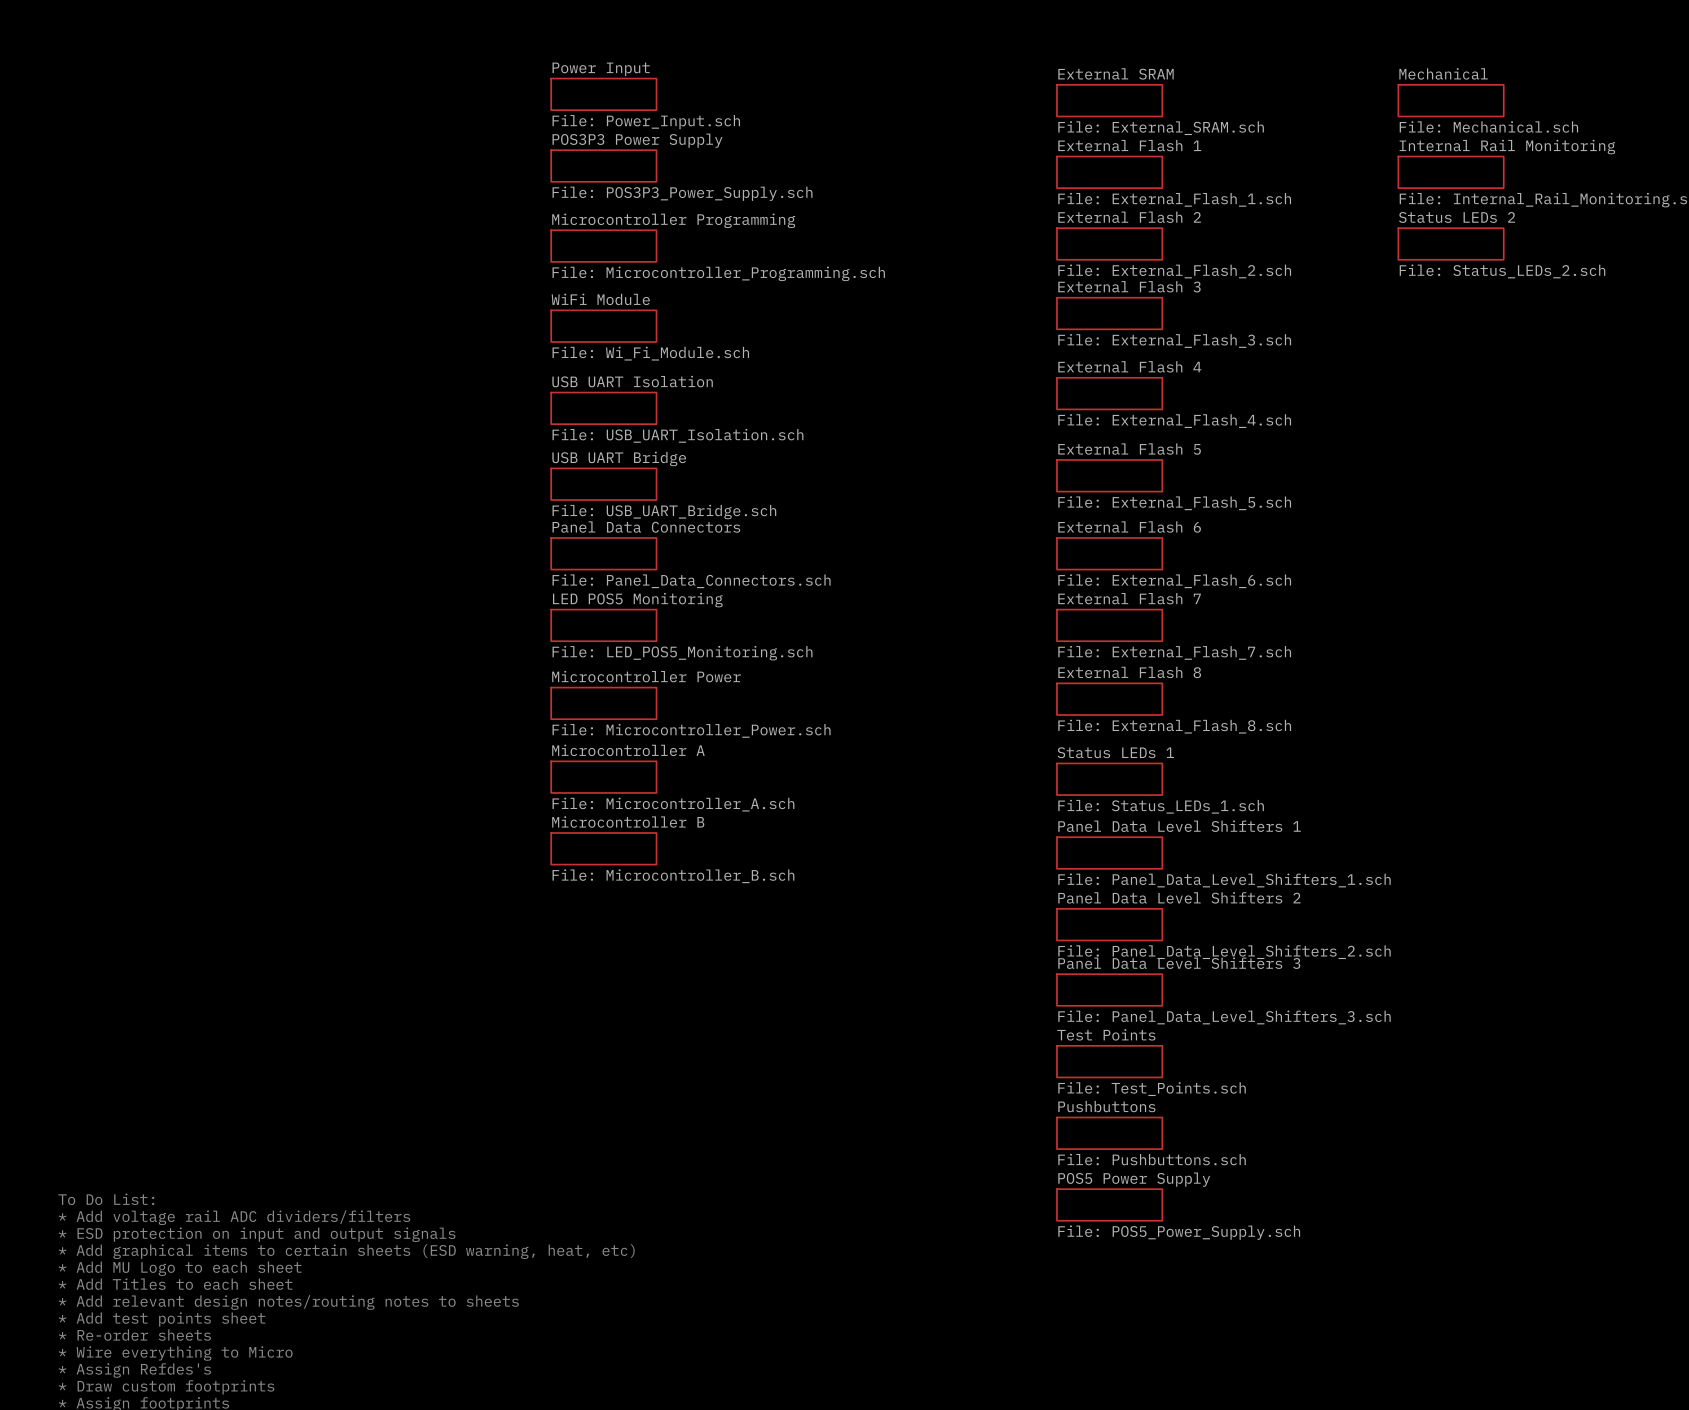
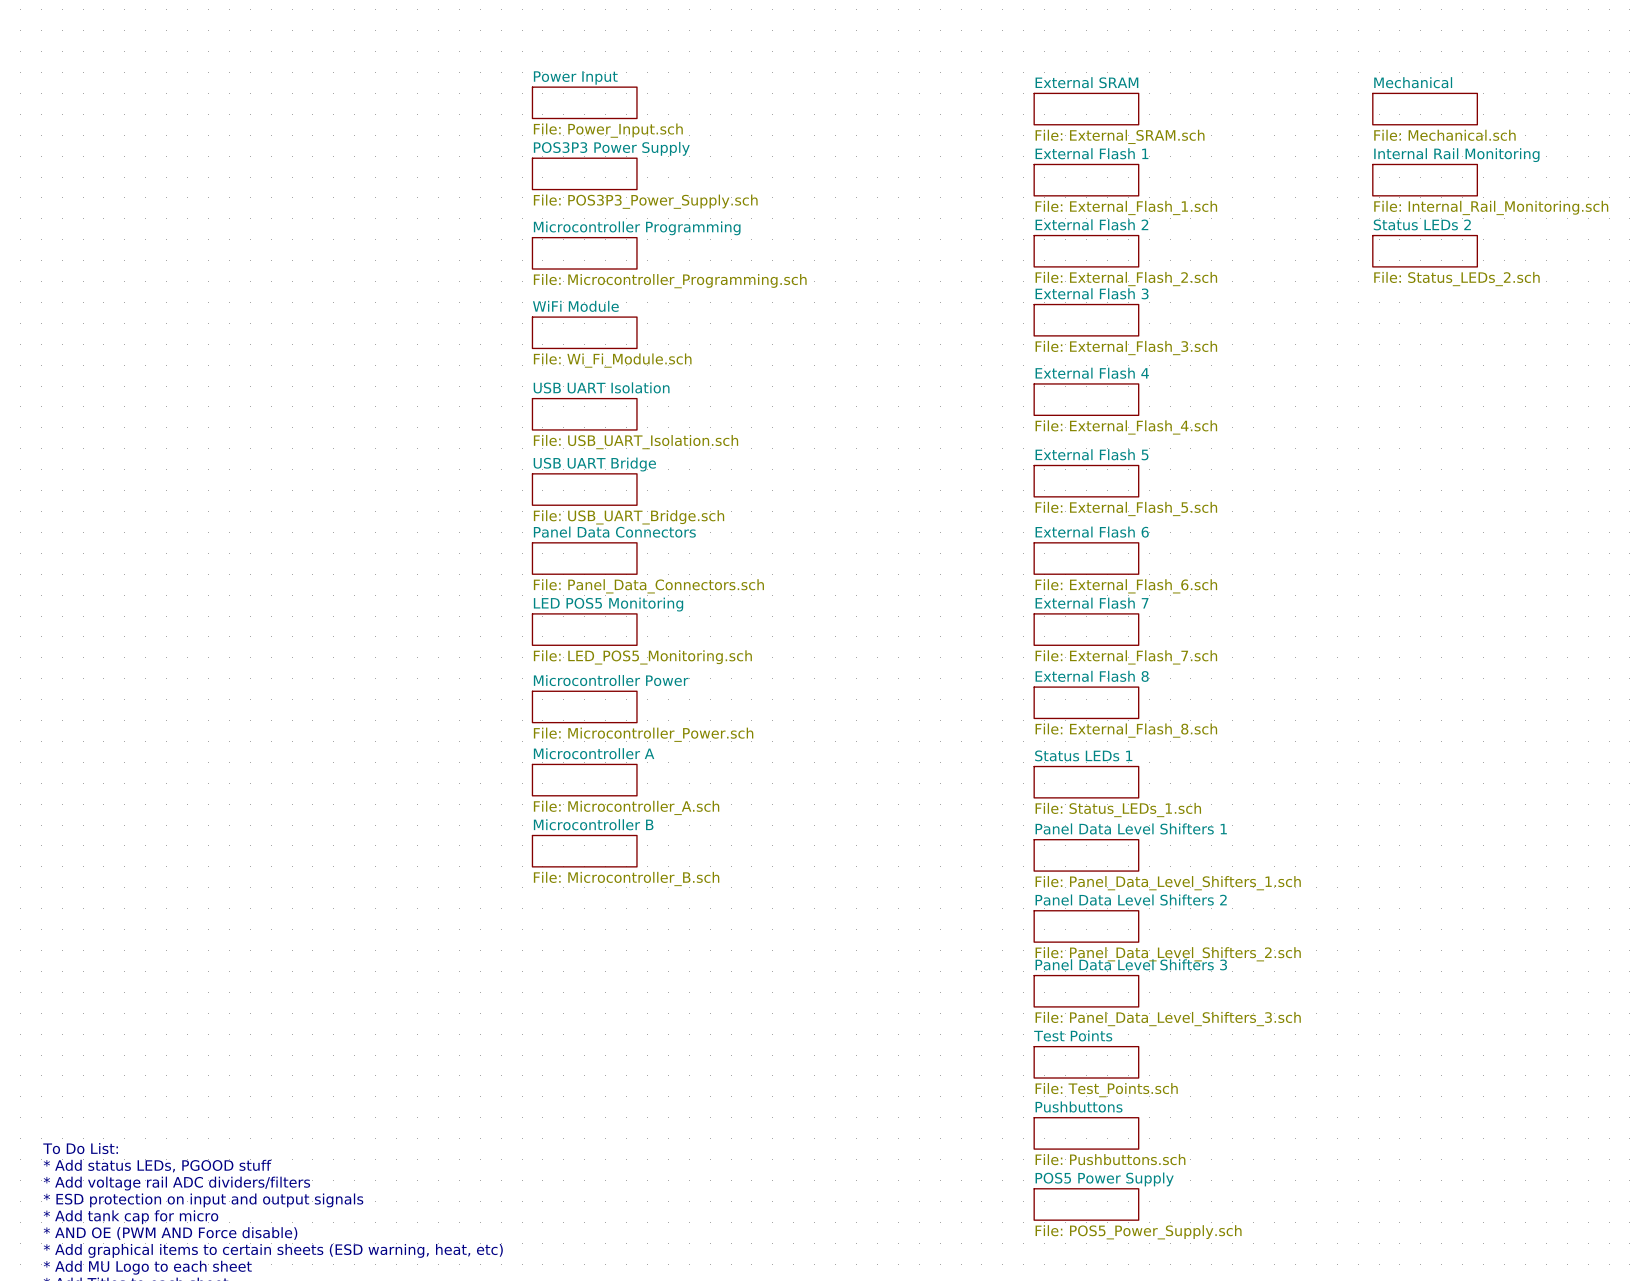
text: none -> To Do List: (80, 1148)
text: none -> * Add status LEDs, PGOOD stuff (157, 1166)
text: none -> * Add voltage rail ADC dividers/filters (176, 1183)
text: To Do List: (106, 1199) -> * ESD protection on input and output signals (203, 1200)
text: * Add voltage rail ADC dividers/filters (234, 1217) -> * Add tank cap for micro (130, 1217)
text: * ESD protection on input and output signals (257, 1234) -> * AND OE (PWM AND Force disable) (170, 1233)

